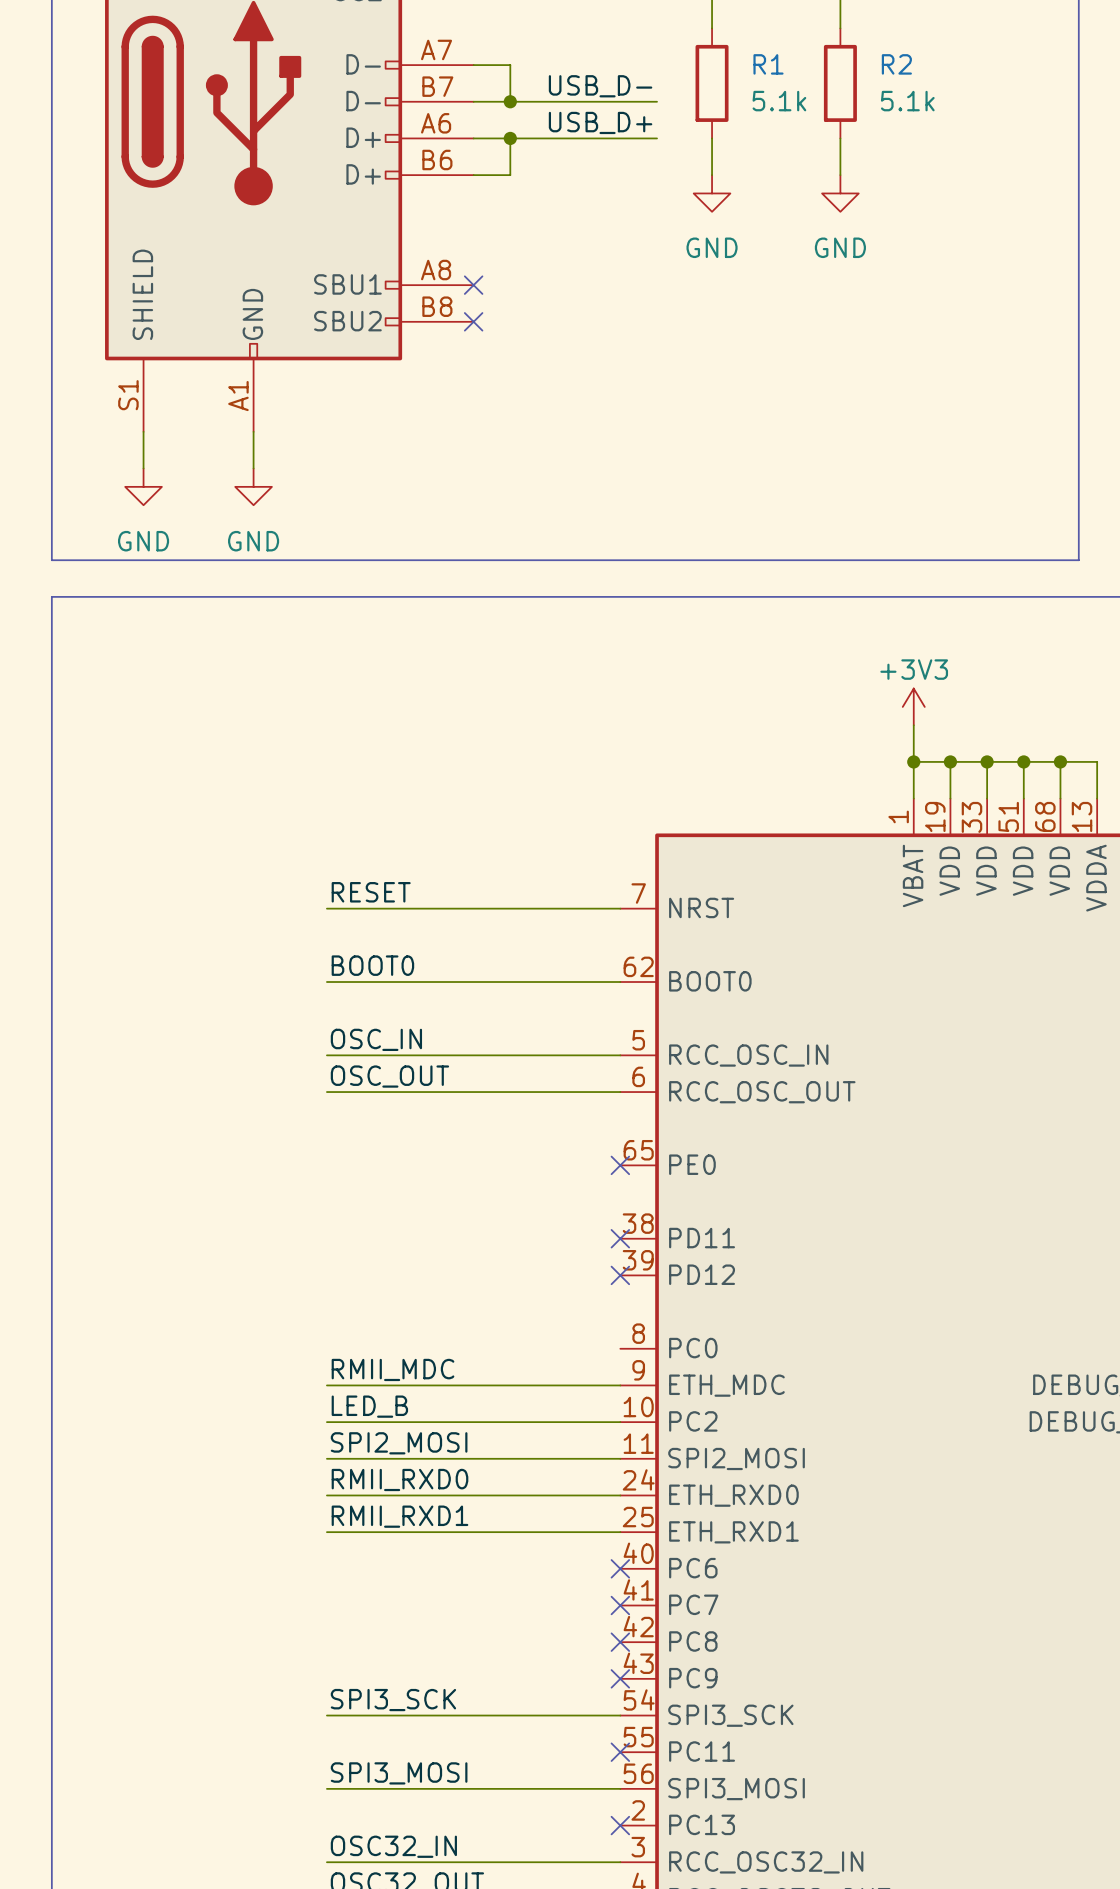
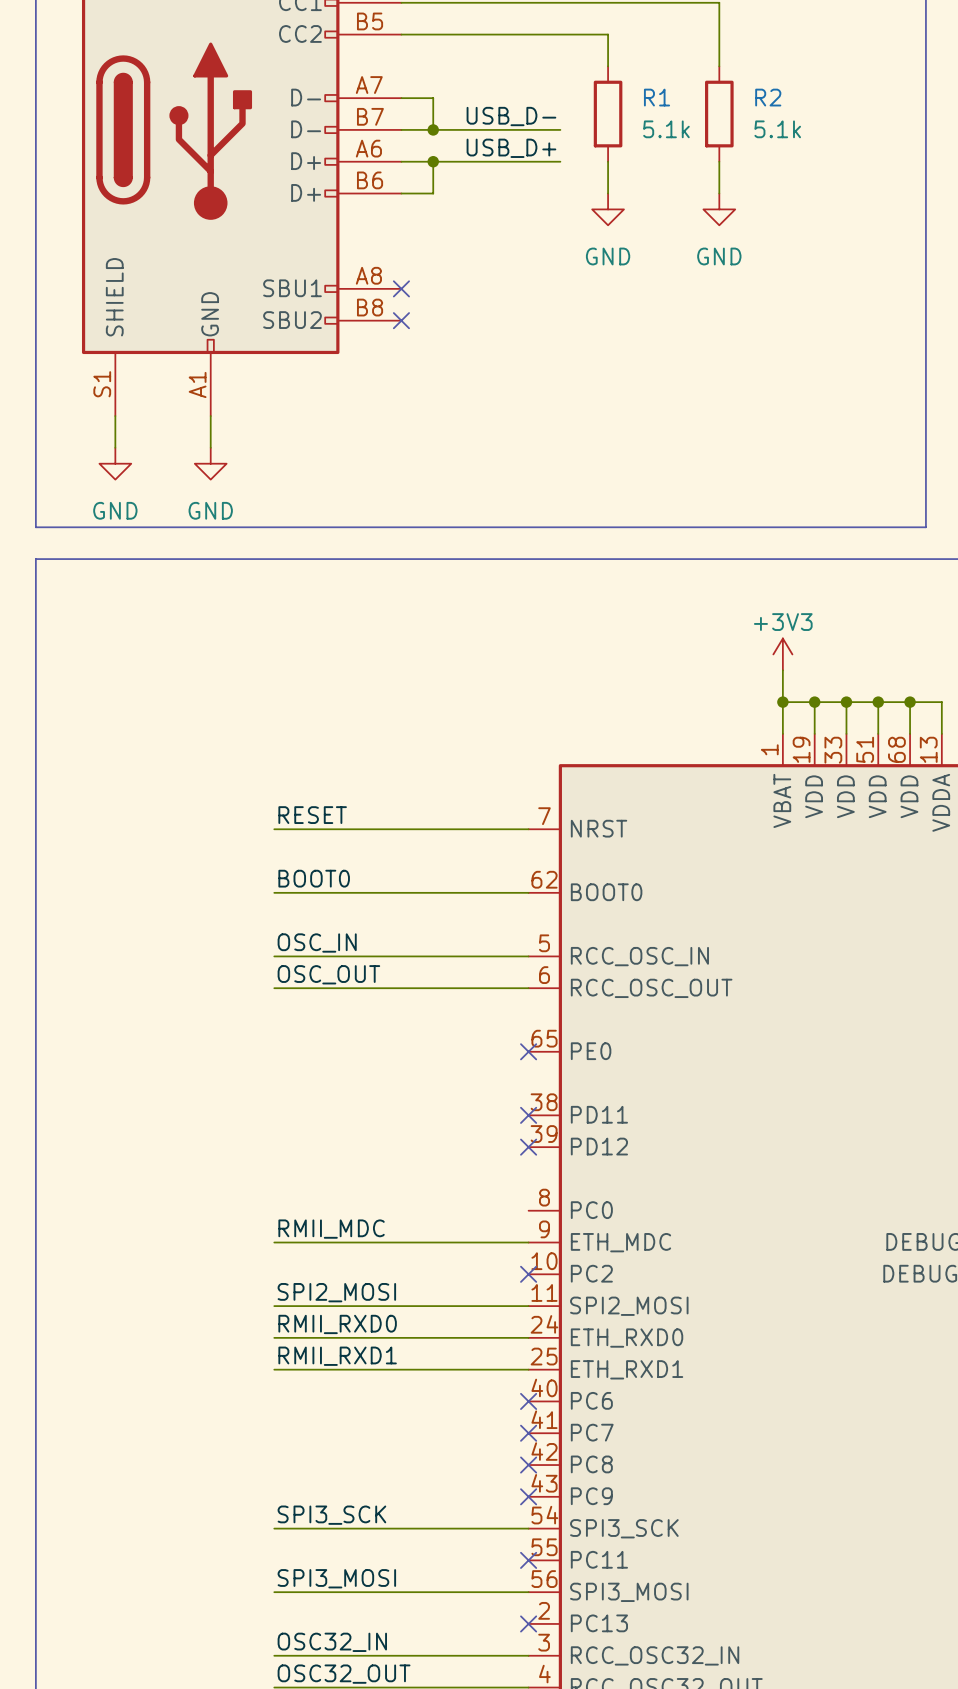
label: LED_B (369, 1406) -> none
wire: (326, 1422) (620, 1422) -> none
no-connect mark: none -> (528, 1274)

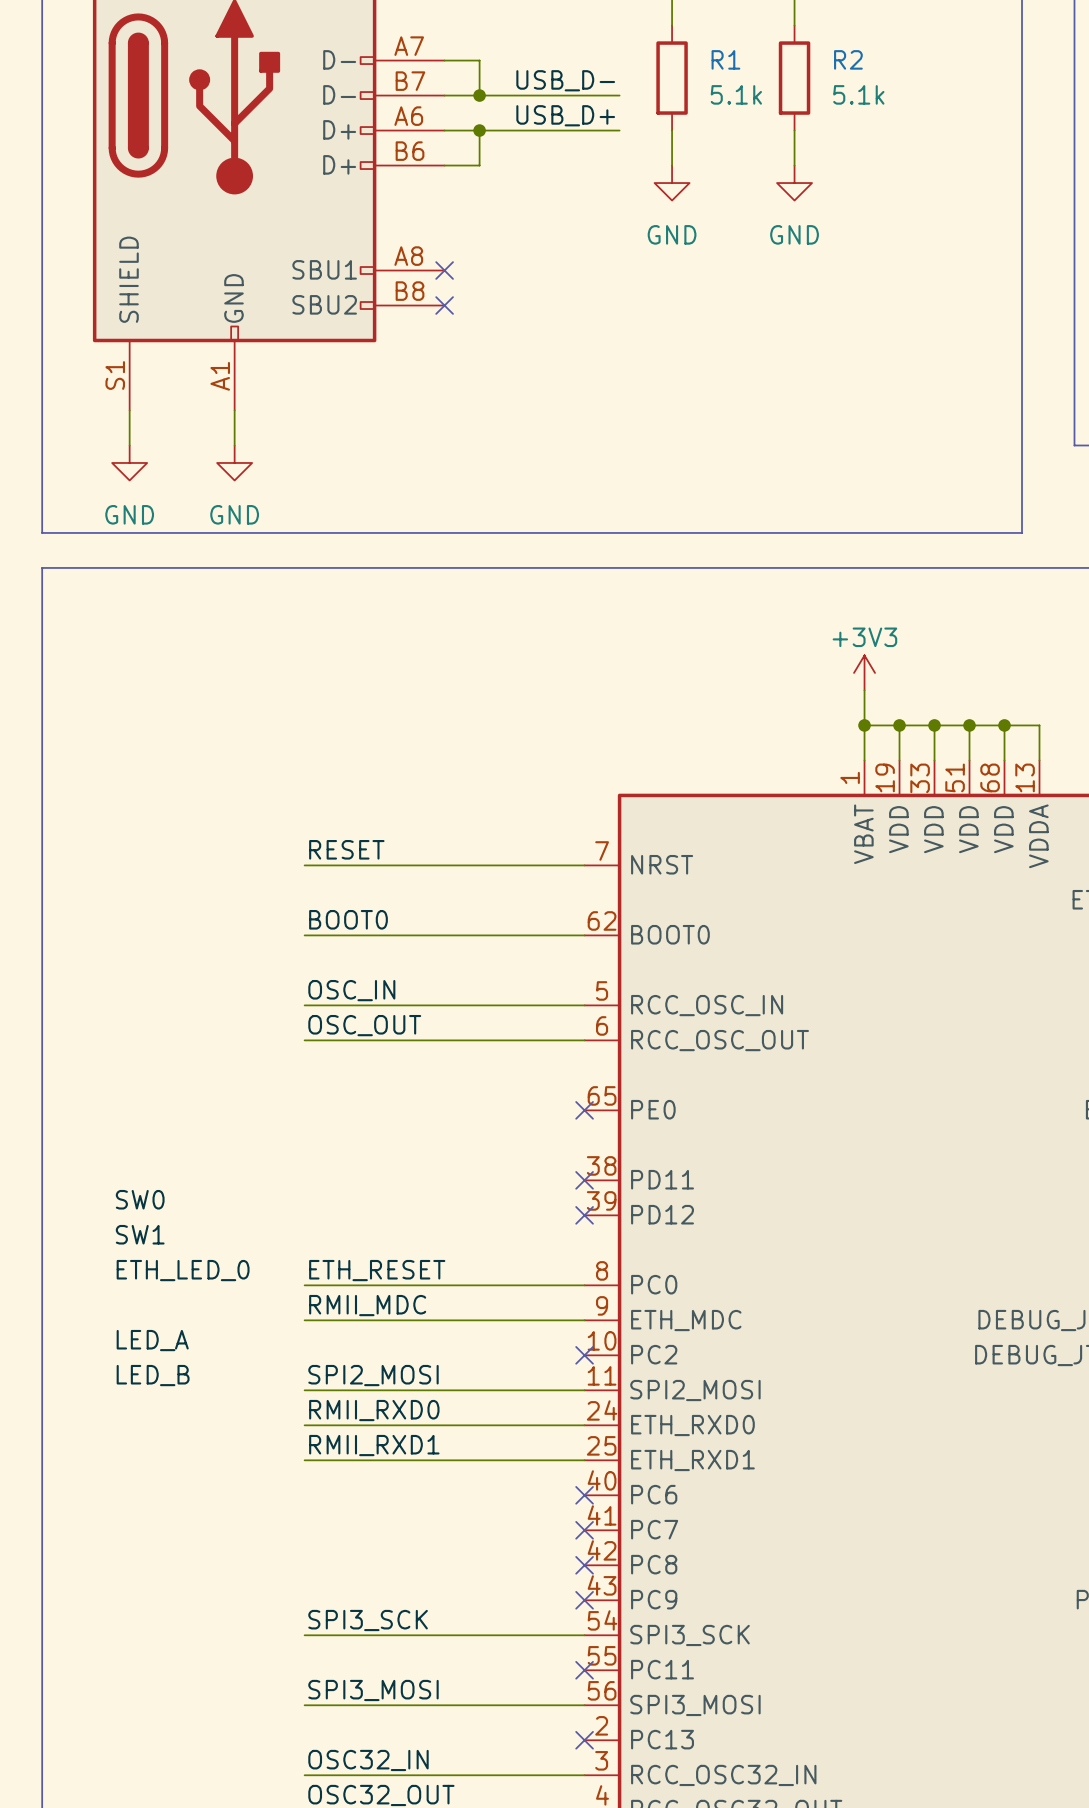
label: none -> SW0 (140, 1199)
label: none -> SW1 (140, 1234)
label: none -> ETH_LED_0 (183, 1270)
label: none -> ETH_RESET (377, 1270)
wire: none -> (304, 1285) (584, 1285)
label: none -> LED_A (152, 1340)
label: none -> LED_B (153, 1375)

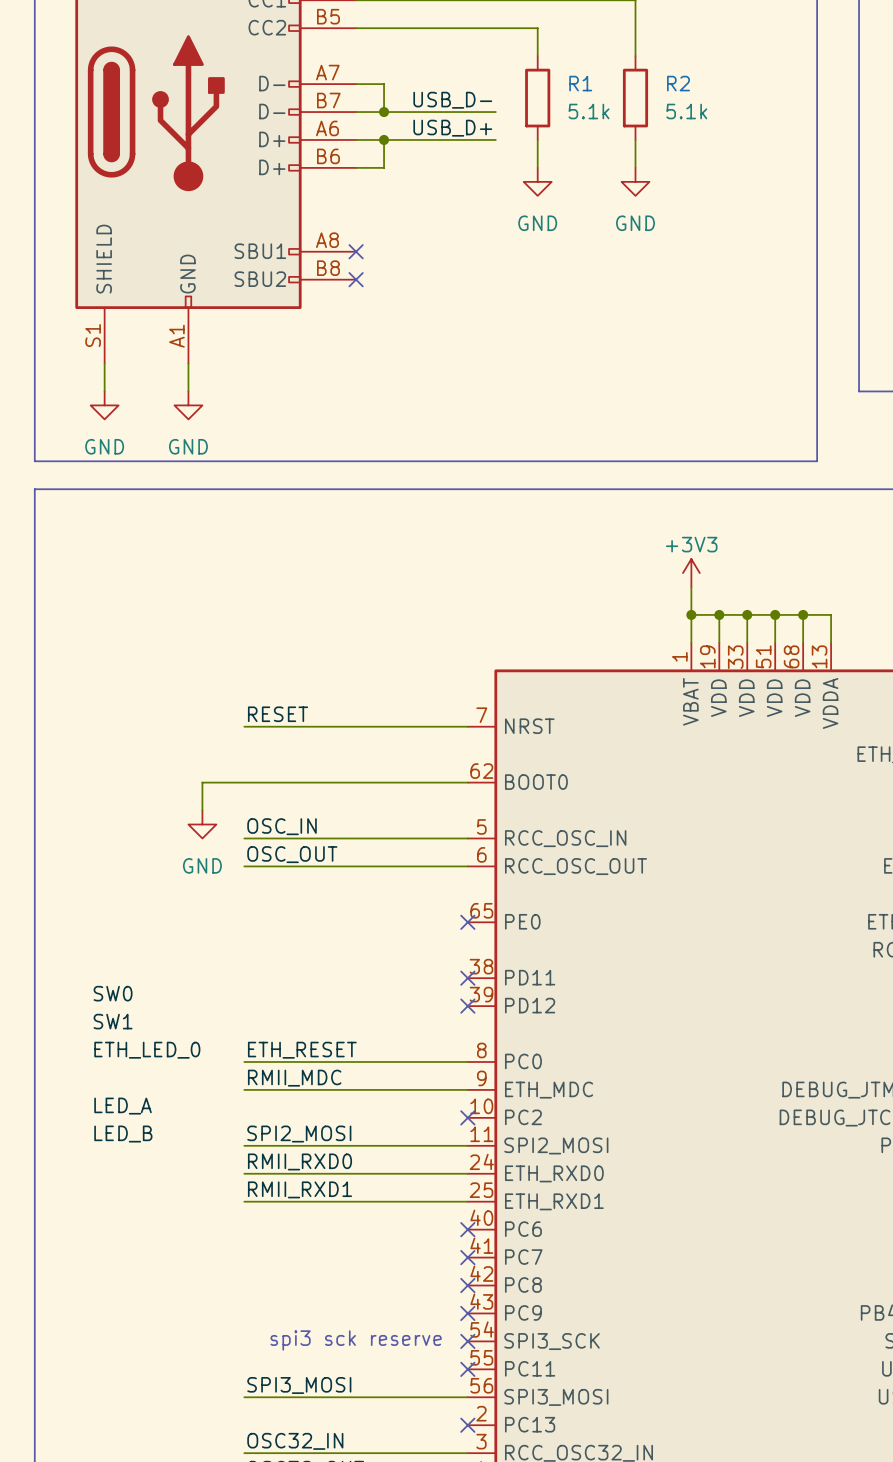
label: BOOT0 (348, 919) -> none
wire: none -> (244, 782) (202, 782) (202, 810)
power symbol: none -> GND (202, 824)
label: SPI3_SCK (368, 1620) -> none
text: none -> spi3 sck reserve (356, 1340)
wire: (304, 1635) (584, 1635) -> none
no-connect mark: none -> (467, 1341)

